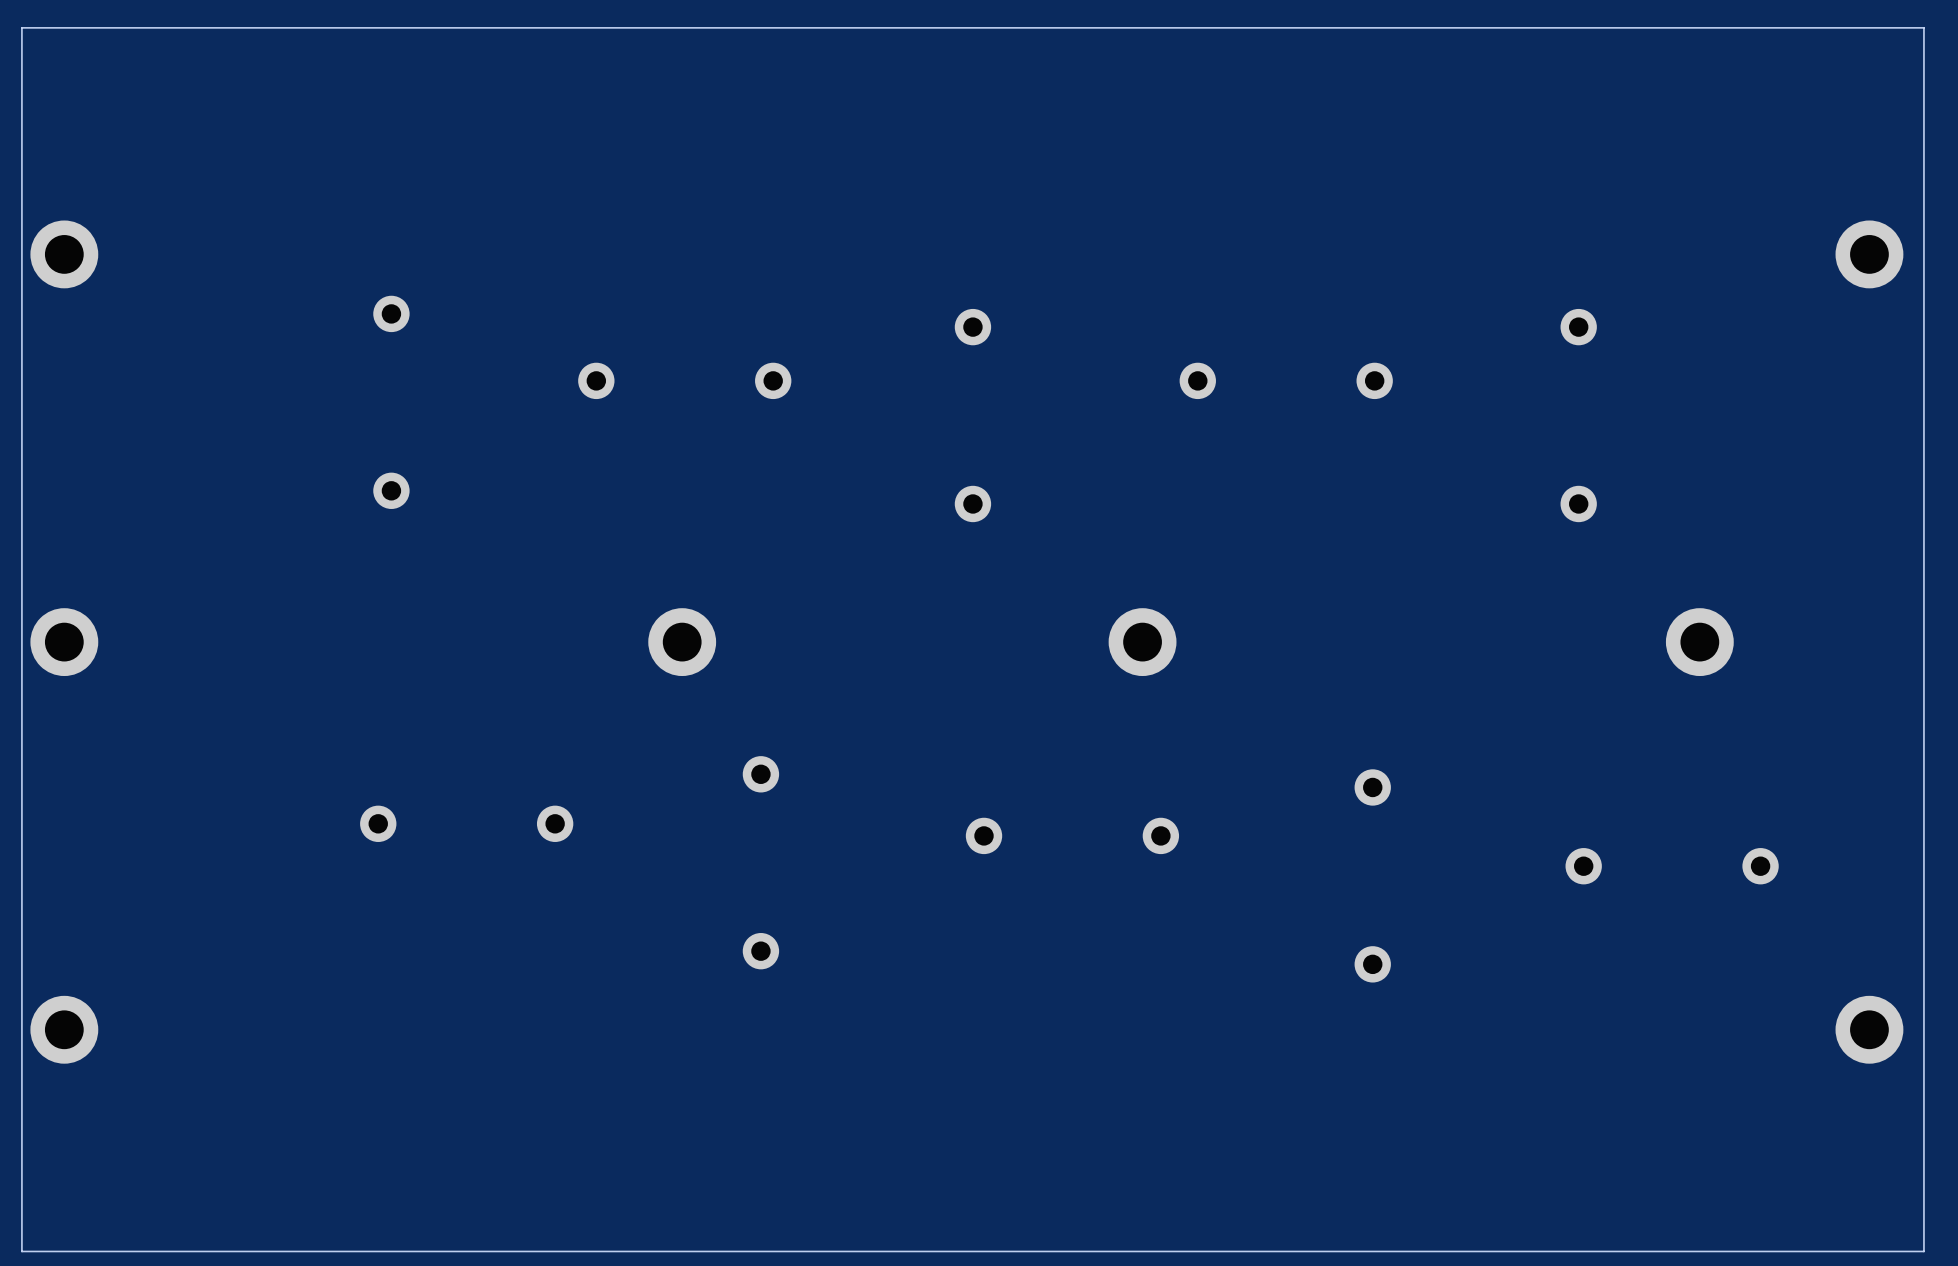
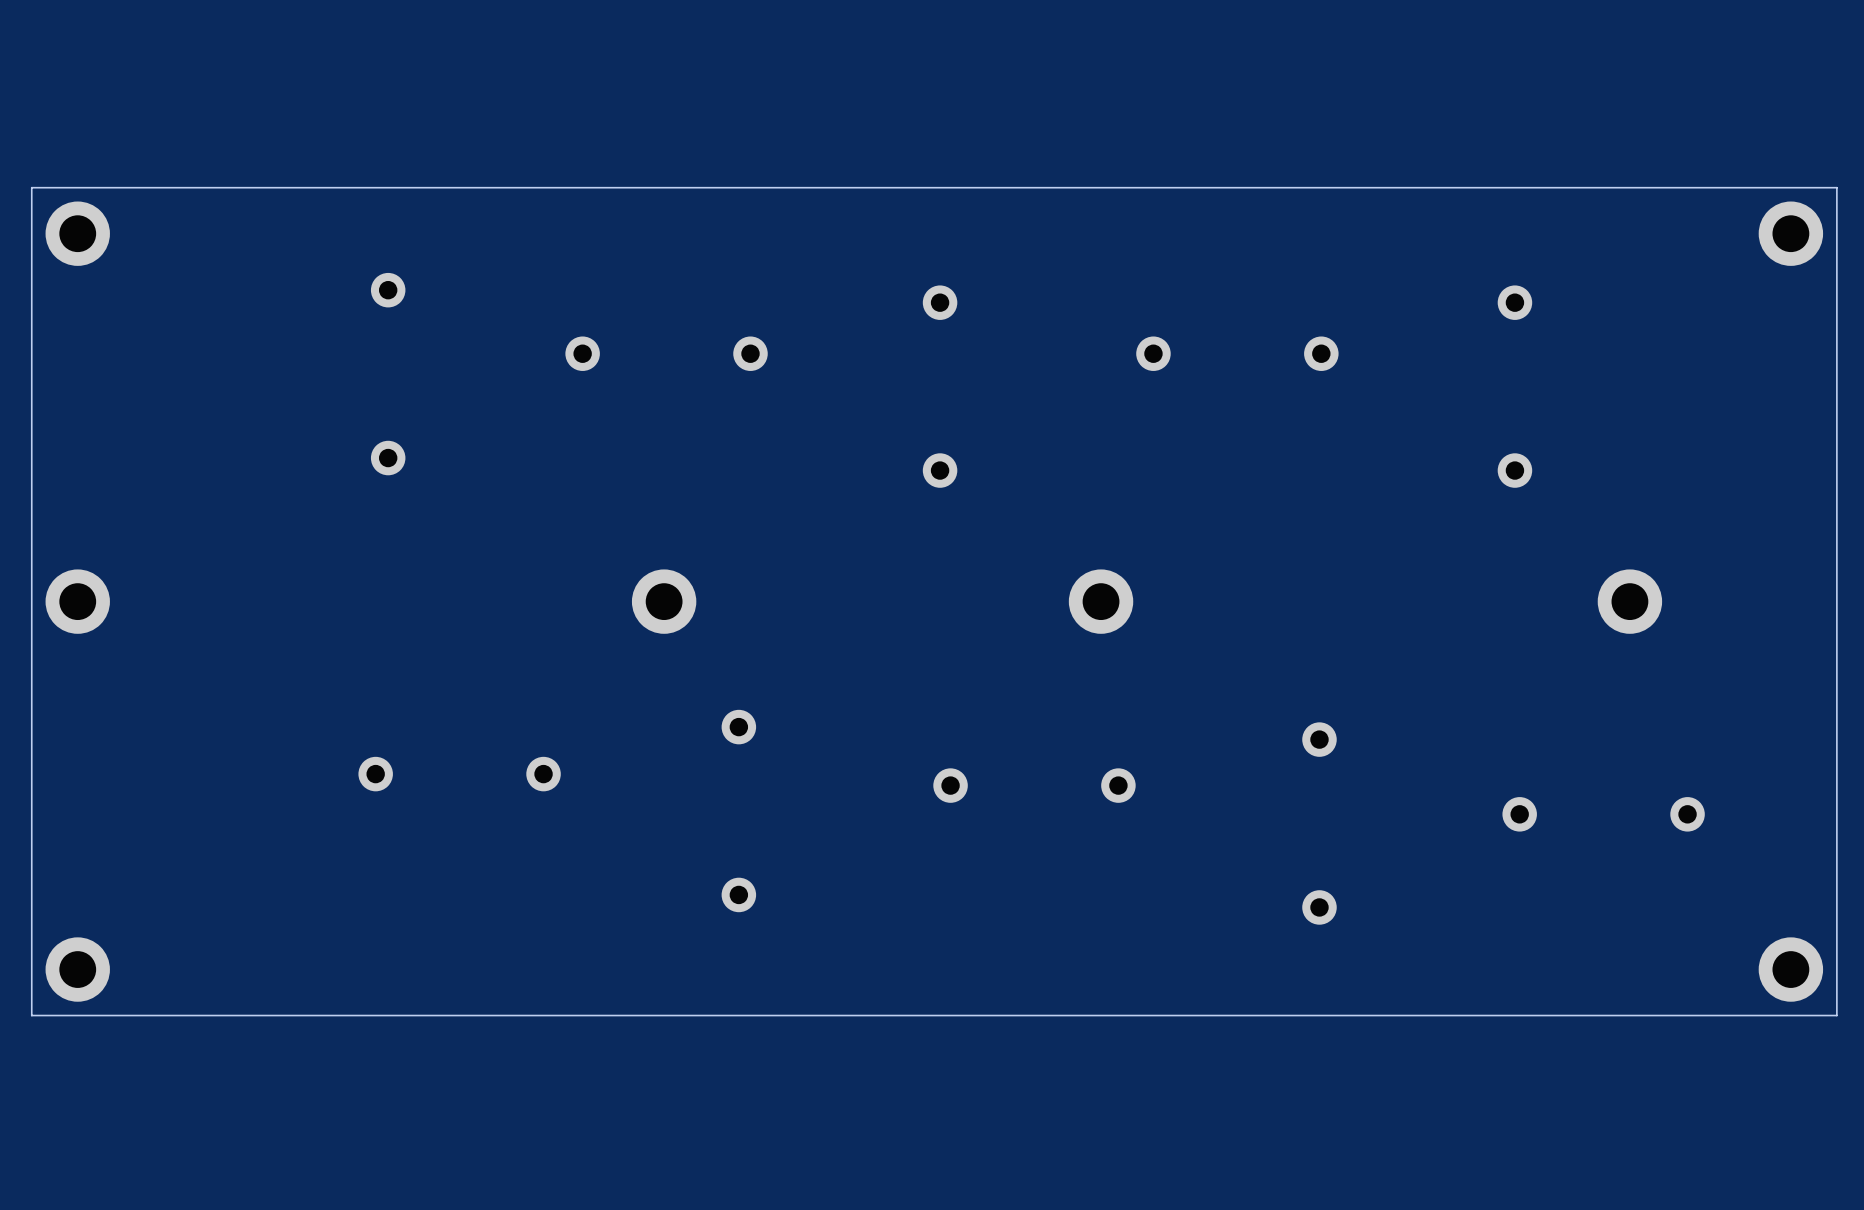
board edge: (1923, 27) (21, 27) (21, 1251) (1923, 1251) (1923, 27) -> (1836, 187) (1836, 1015) (31, 1015) (31, 187) (1836, 187)

